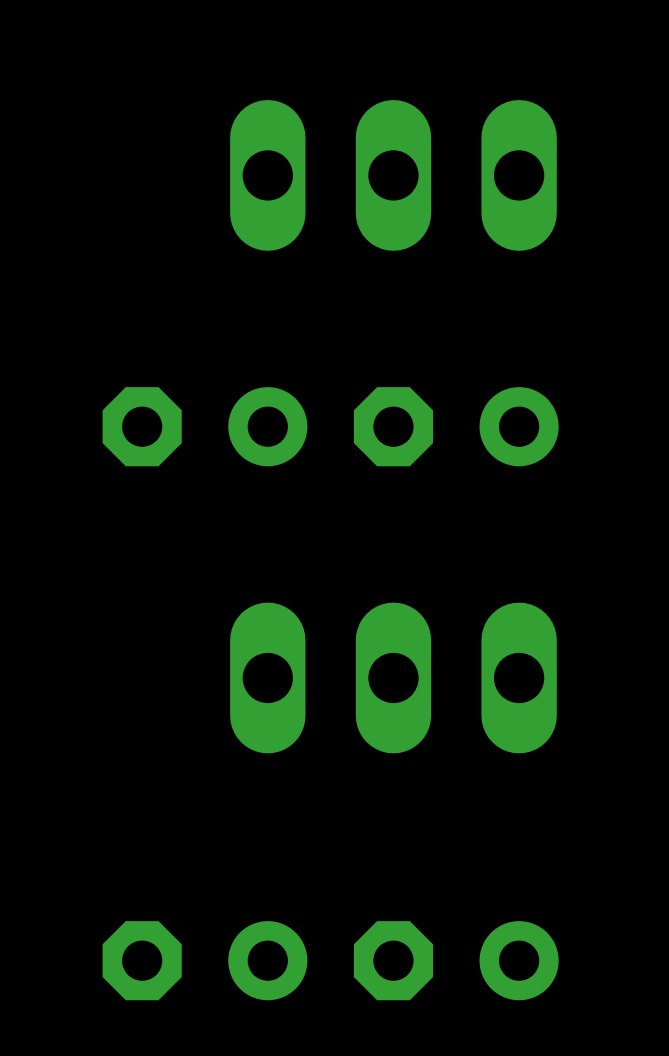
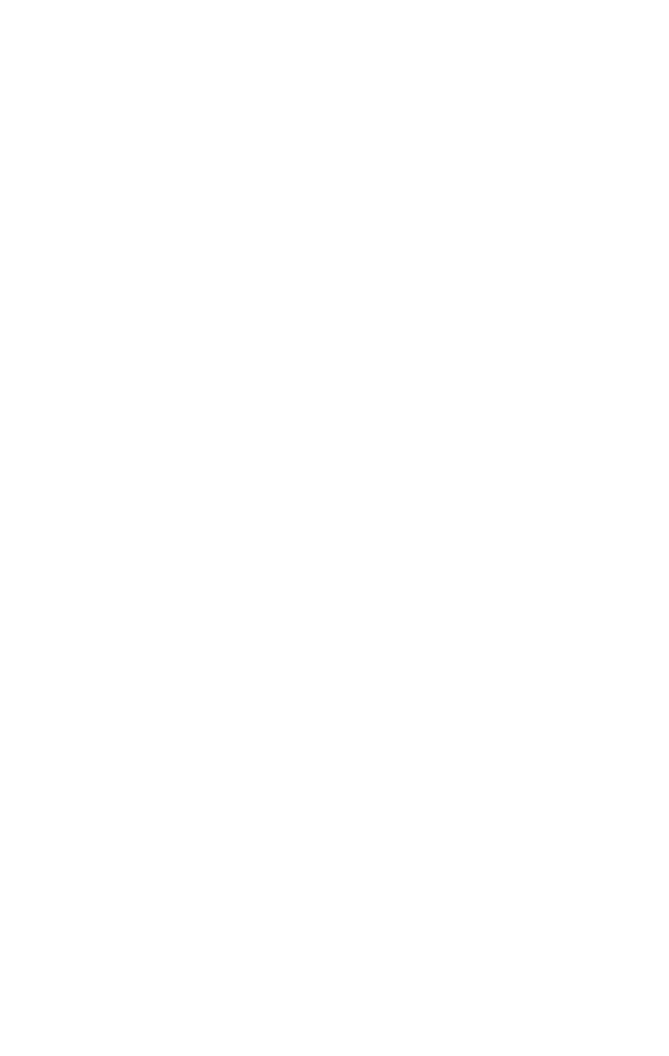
part: (393, 175) -> none
part: (204, 426) -> none
part: (456, 426) -> none
part: (393, 677) -> none
part: (204, 960) -> none
part: (456, 960) -> none

